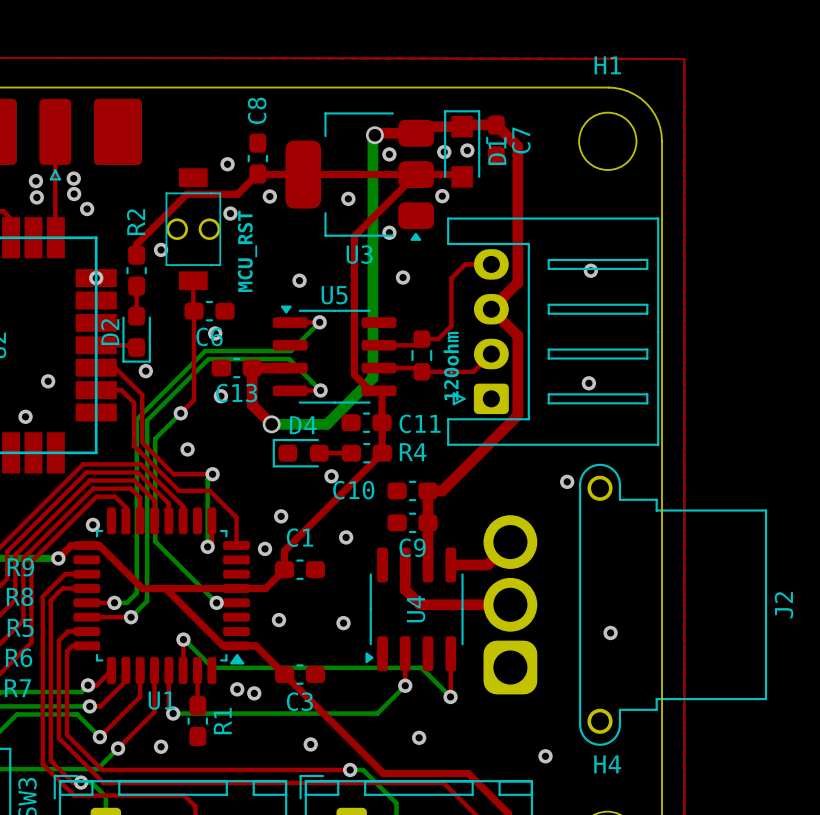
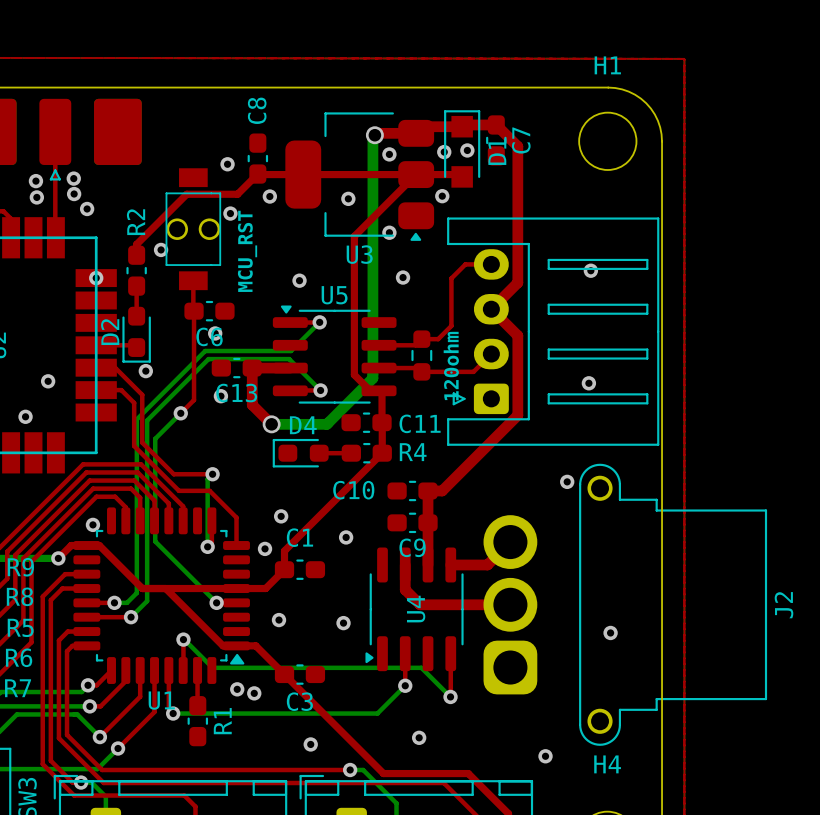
via: (187, 449) -> none
via: (331, 476) -> none
via: (161, 746) -> none

